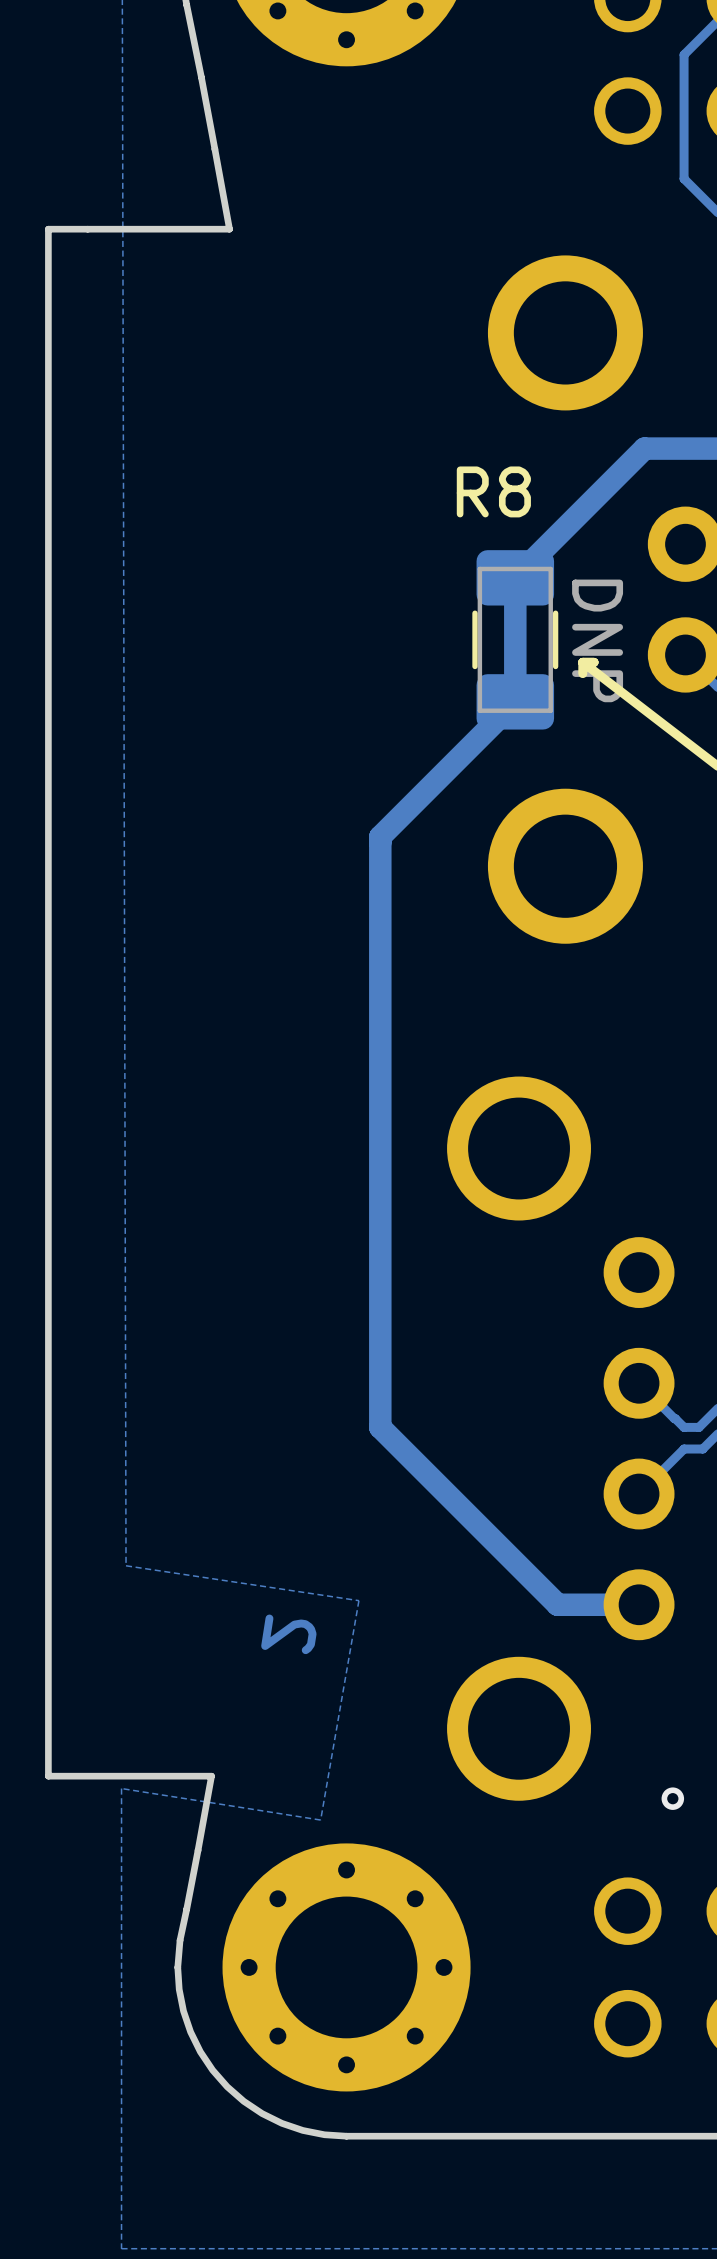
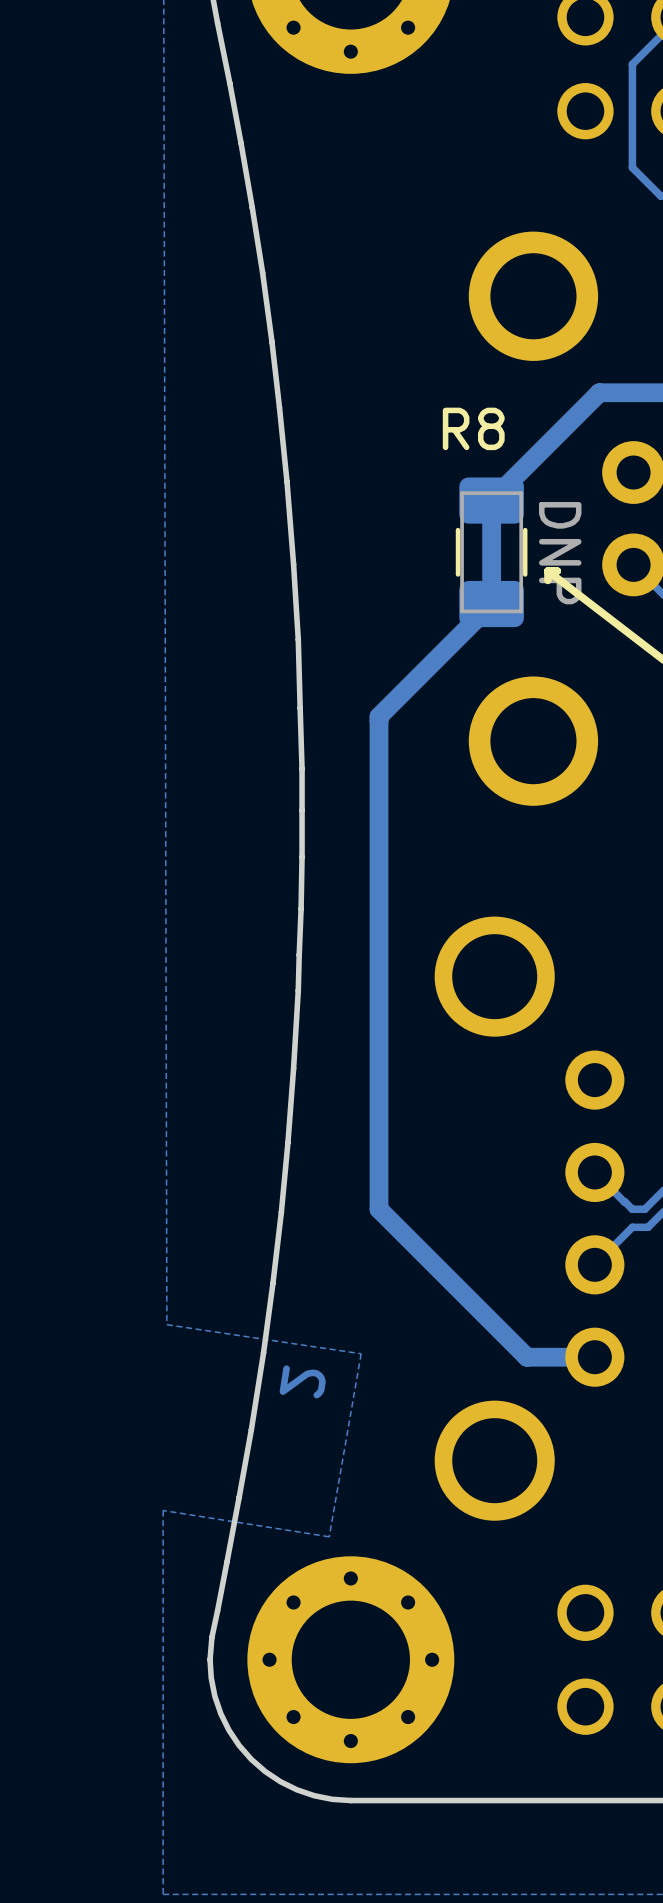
board edge: (214, 149) (229, 229) (48, 229) (48, 1776) (211, 1776) (198, 1850) -> (241, 143) (262, 272) (287, 481) (298, 639) (302, 769) (302, 857) (298, 990) (281, 1212) (263, 1352) (226, 1562)
via: (672, 1798) -> none

